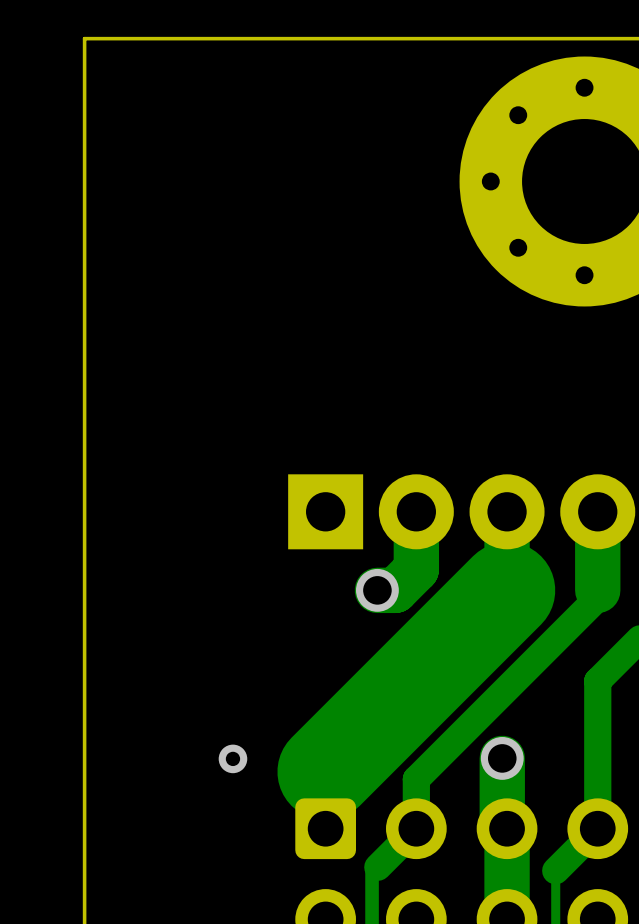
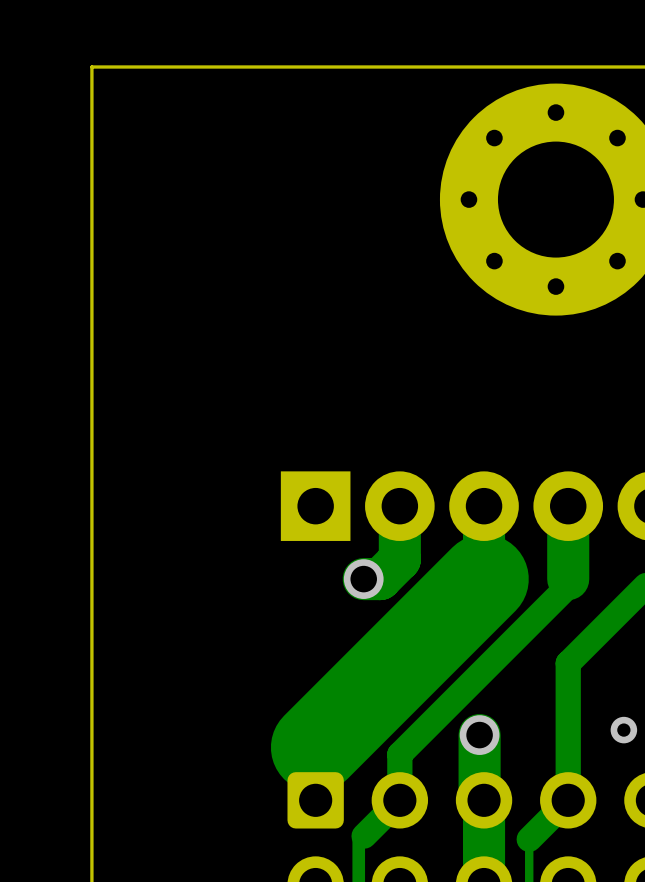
via: (232, 758) -> none

